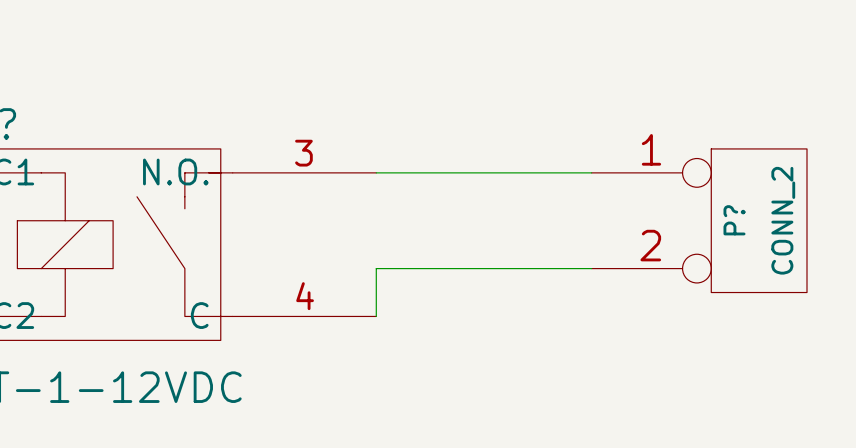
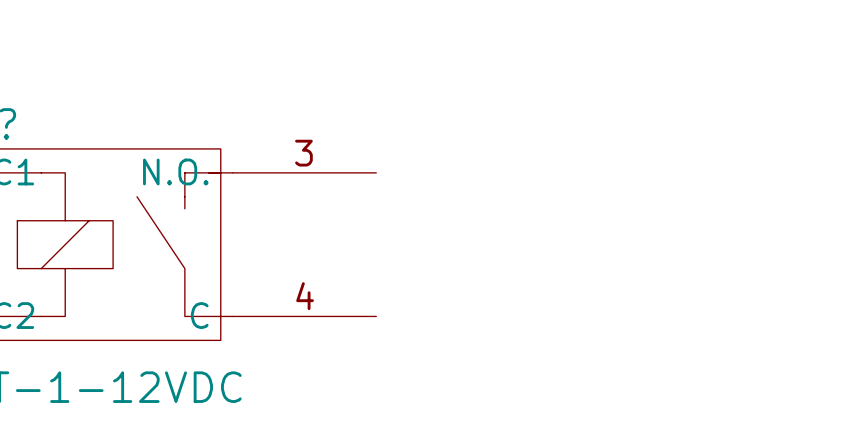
wire: (376, 172) (591, 172) -> none
P?: CONN_2 (699, 220) -> none
wire: (591, 268) (376, 268) (376, 316) -> none

